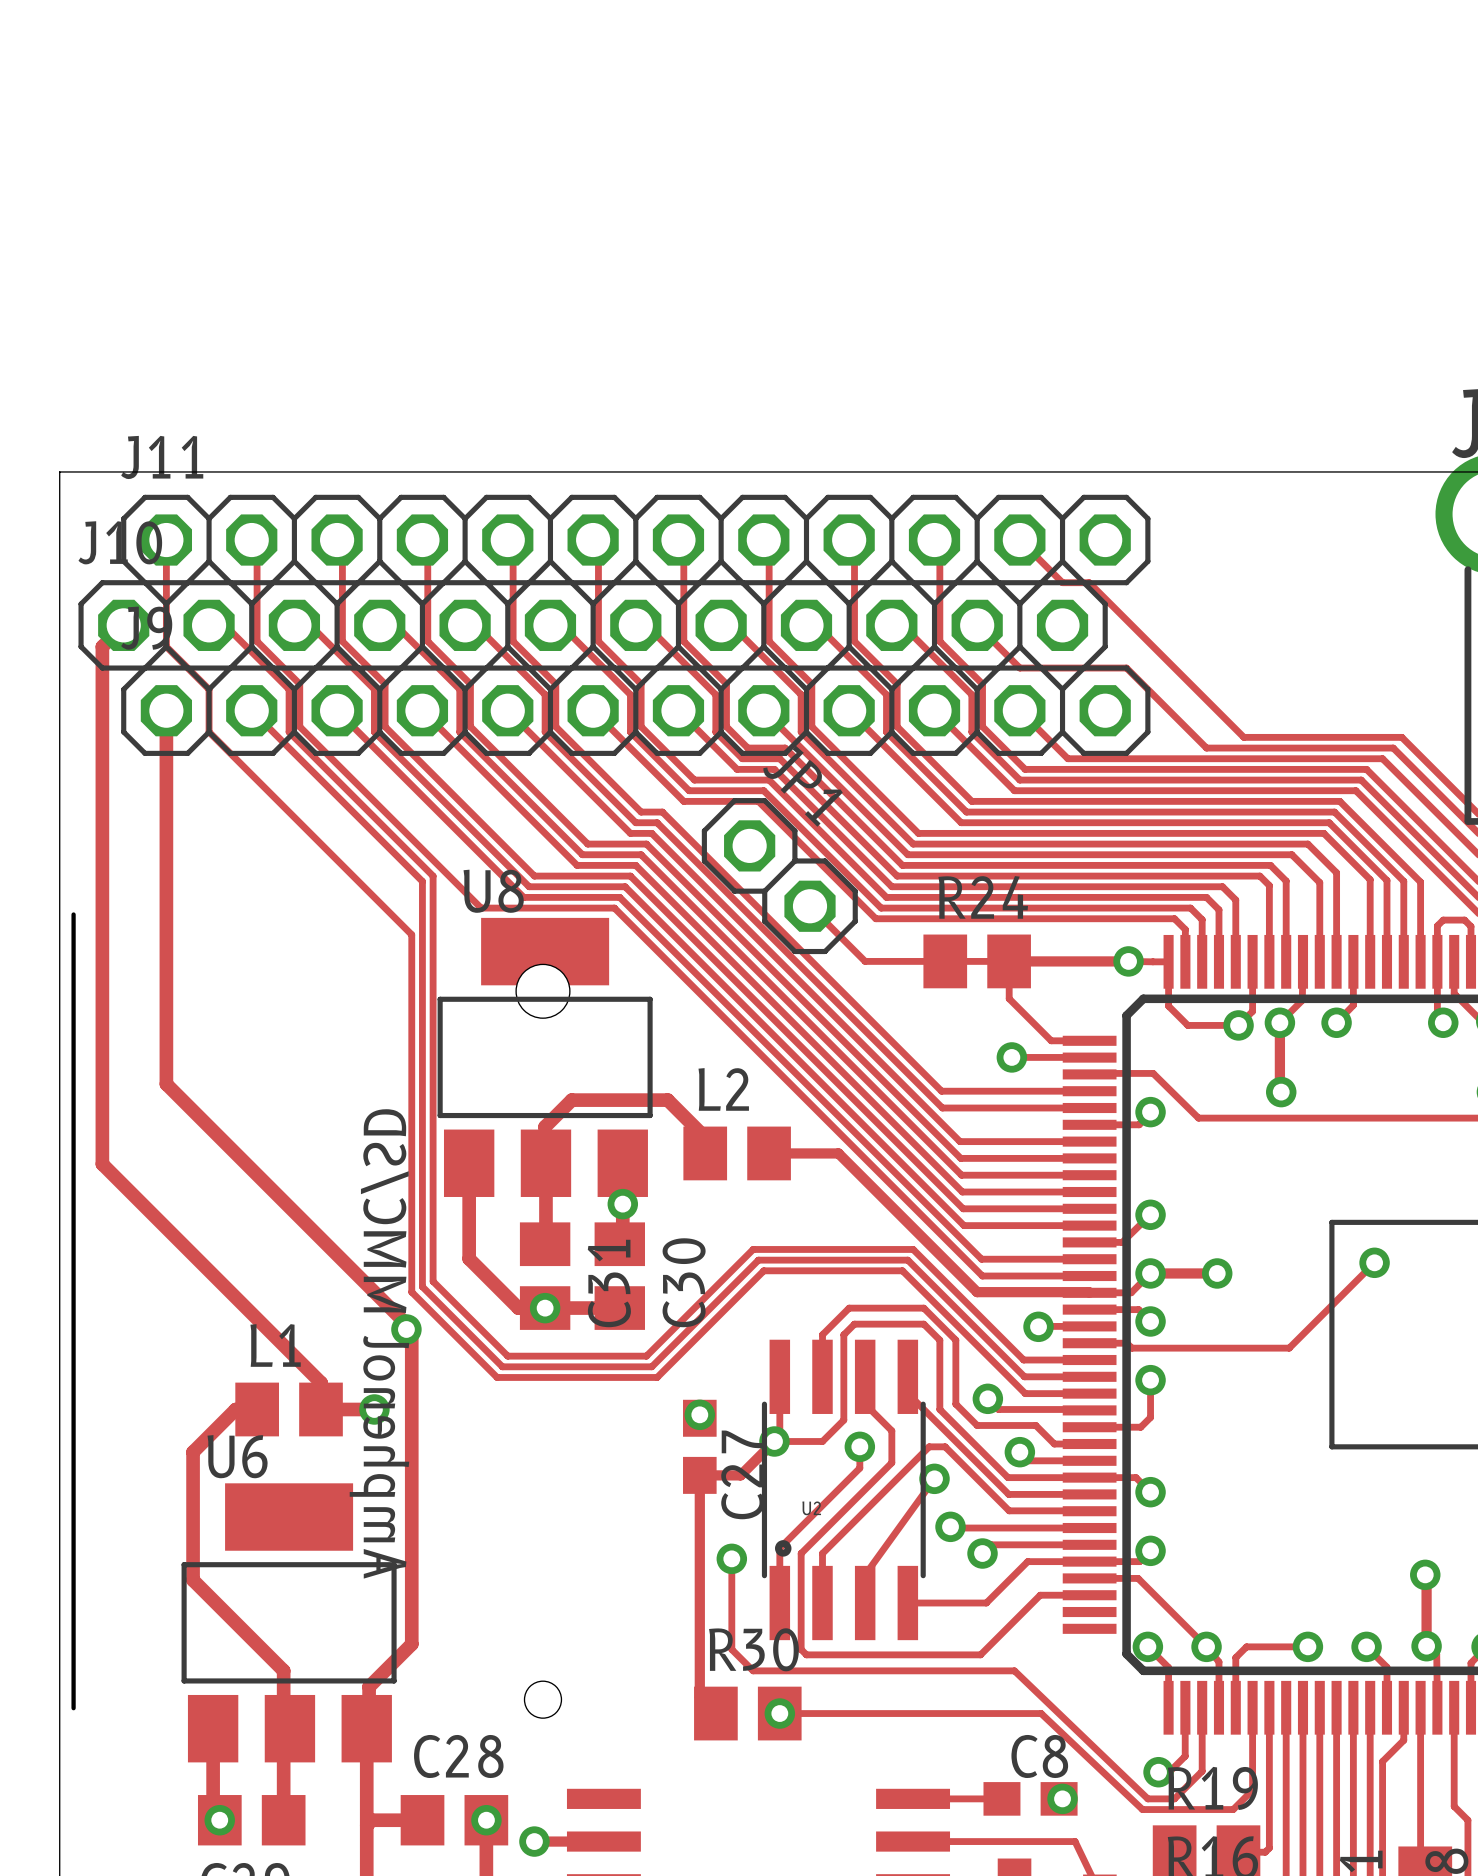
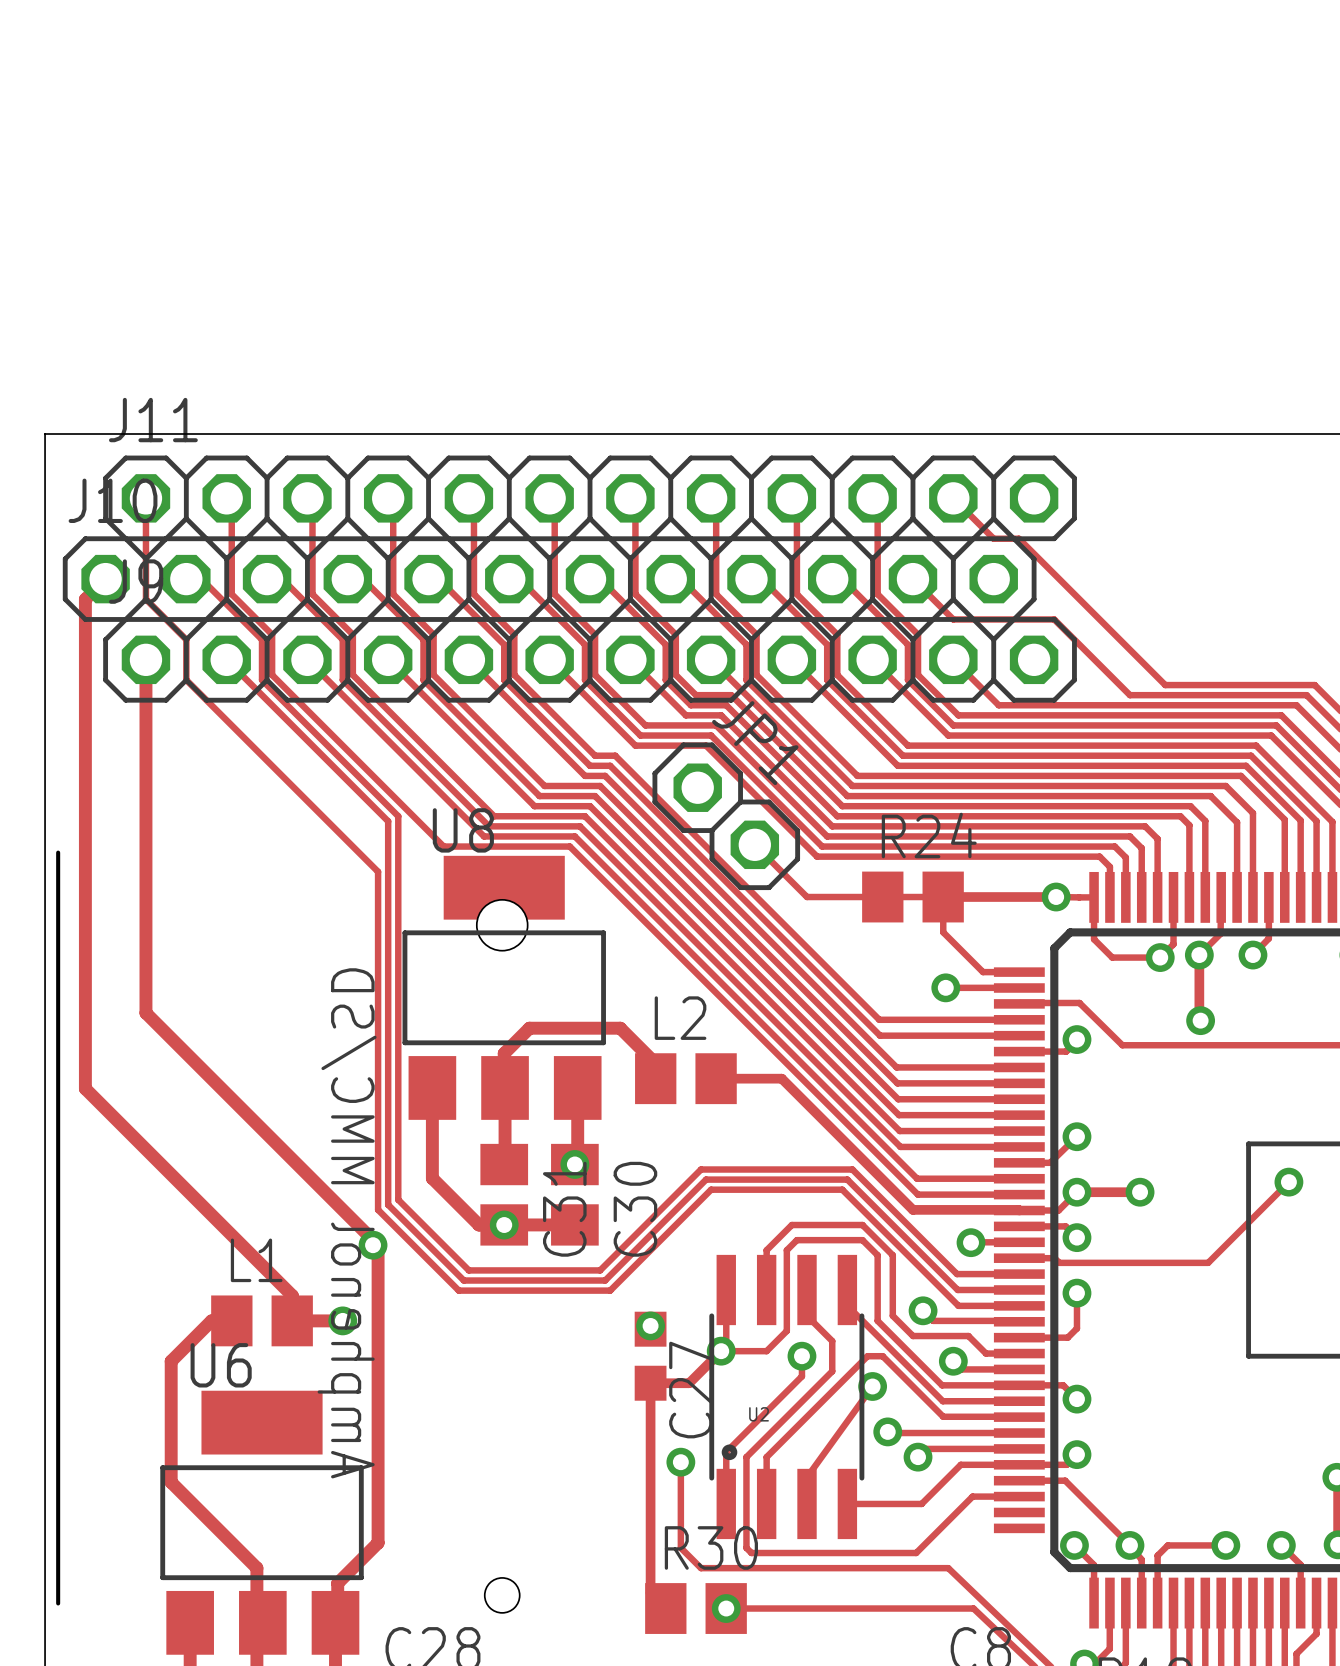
via position: (622, 1204) -> (574, 1164)

